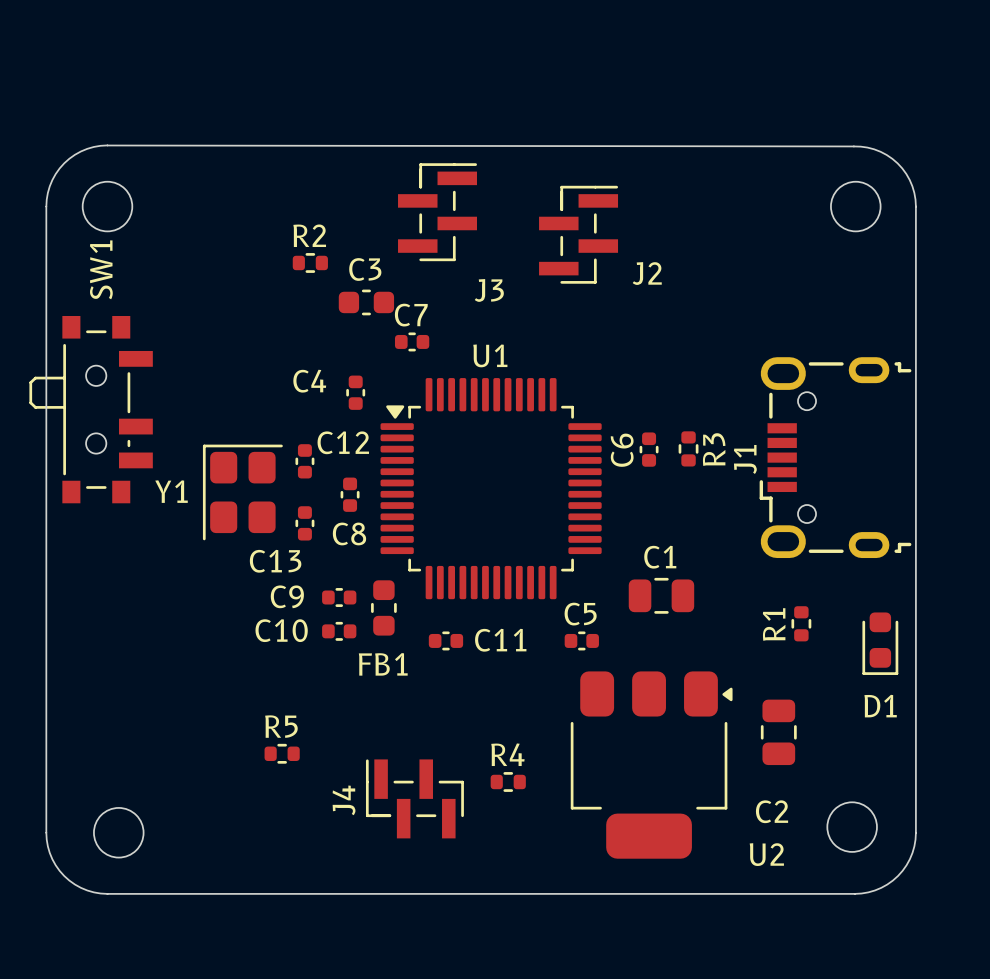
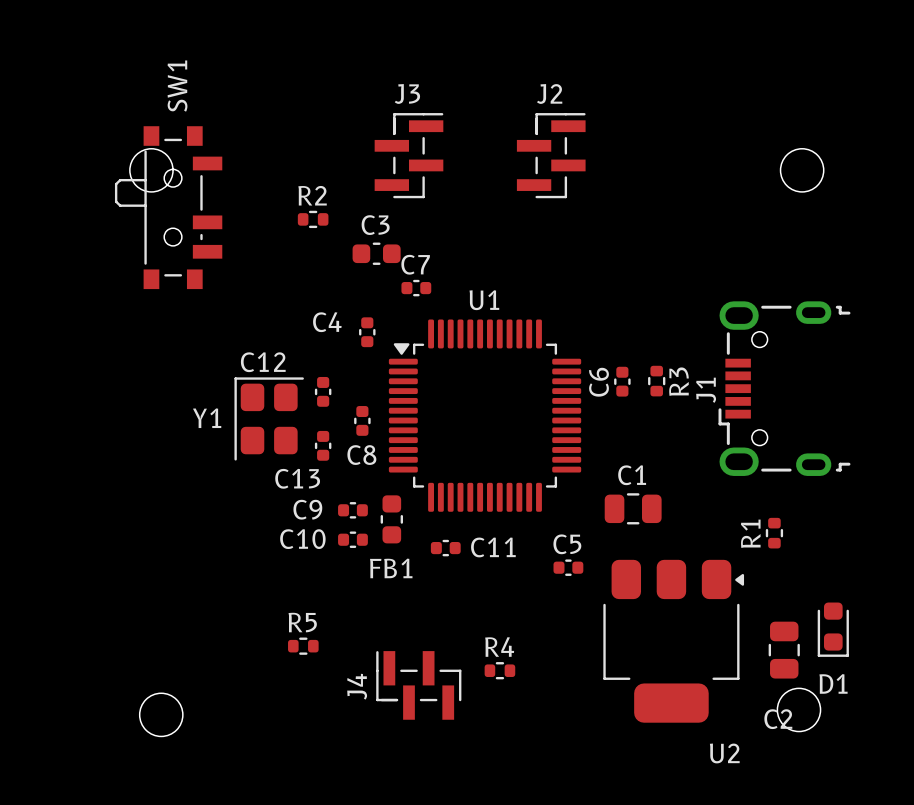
board edge: (107, 145) (853, 146) (874, 149) (886, 155) (897, 163) (906, 173) (912, 186) (915, 206) (915, 832) (914, 846) (909, 859) (898, 875) (887, 884) (874, 890) (854, 893) (107, 893) (93, 892) (80, 887) (64, 875) (55, 865) (49, 852) (46, 832) (46, 199) (52, 180) (64, 163) (80, 151) (93, 146) (107, 145) -> none
J3 position: (437, 212) -> (408, 155)
J2 position: (578, 234) -> (551, 155)
R2 position: (310, 262) -> (313, 219)
J2 name position: J2 (647, 273) -> J2 (549, 93)
J3 name position: J3 (489, 290) -> J3 (407, 93)
SW1 position: (91, 409) -> (168, 207)
C12 name position: C12 (343, 442) -> C12 (263, 362)
R1 position: (801, 623) -> (774, 533)
C5 position: (581, 640) -> (568, 567)
D1 position: (880, 643) -> (833, 629)
C2 position: (778, 732) -> (784, 650)
U2 position: (651, 765) -> (673, 641)
U2 name position: U2 (766, 854) -> U2 (724, 753)

